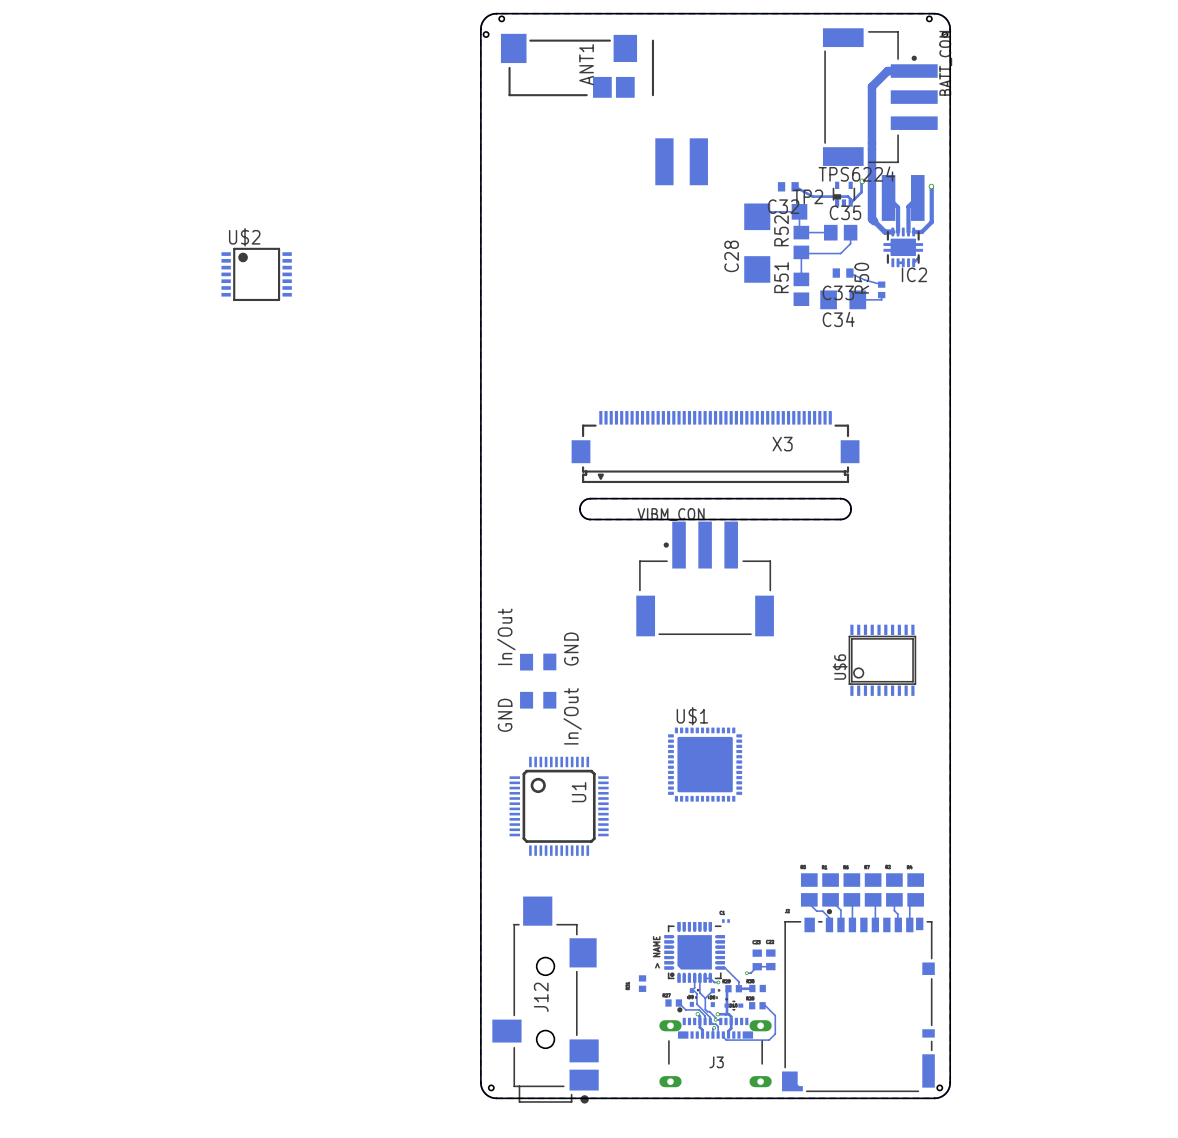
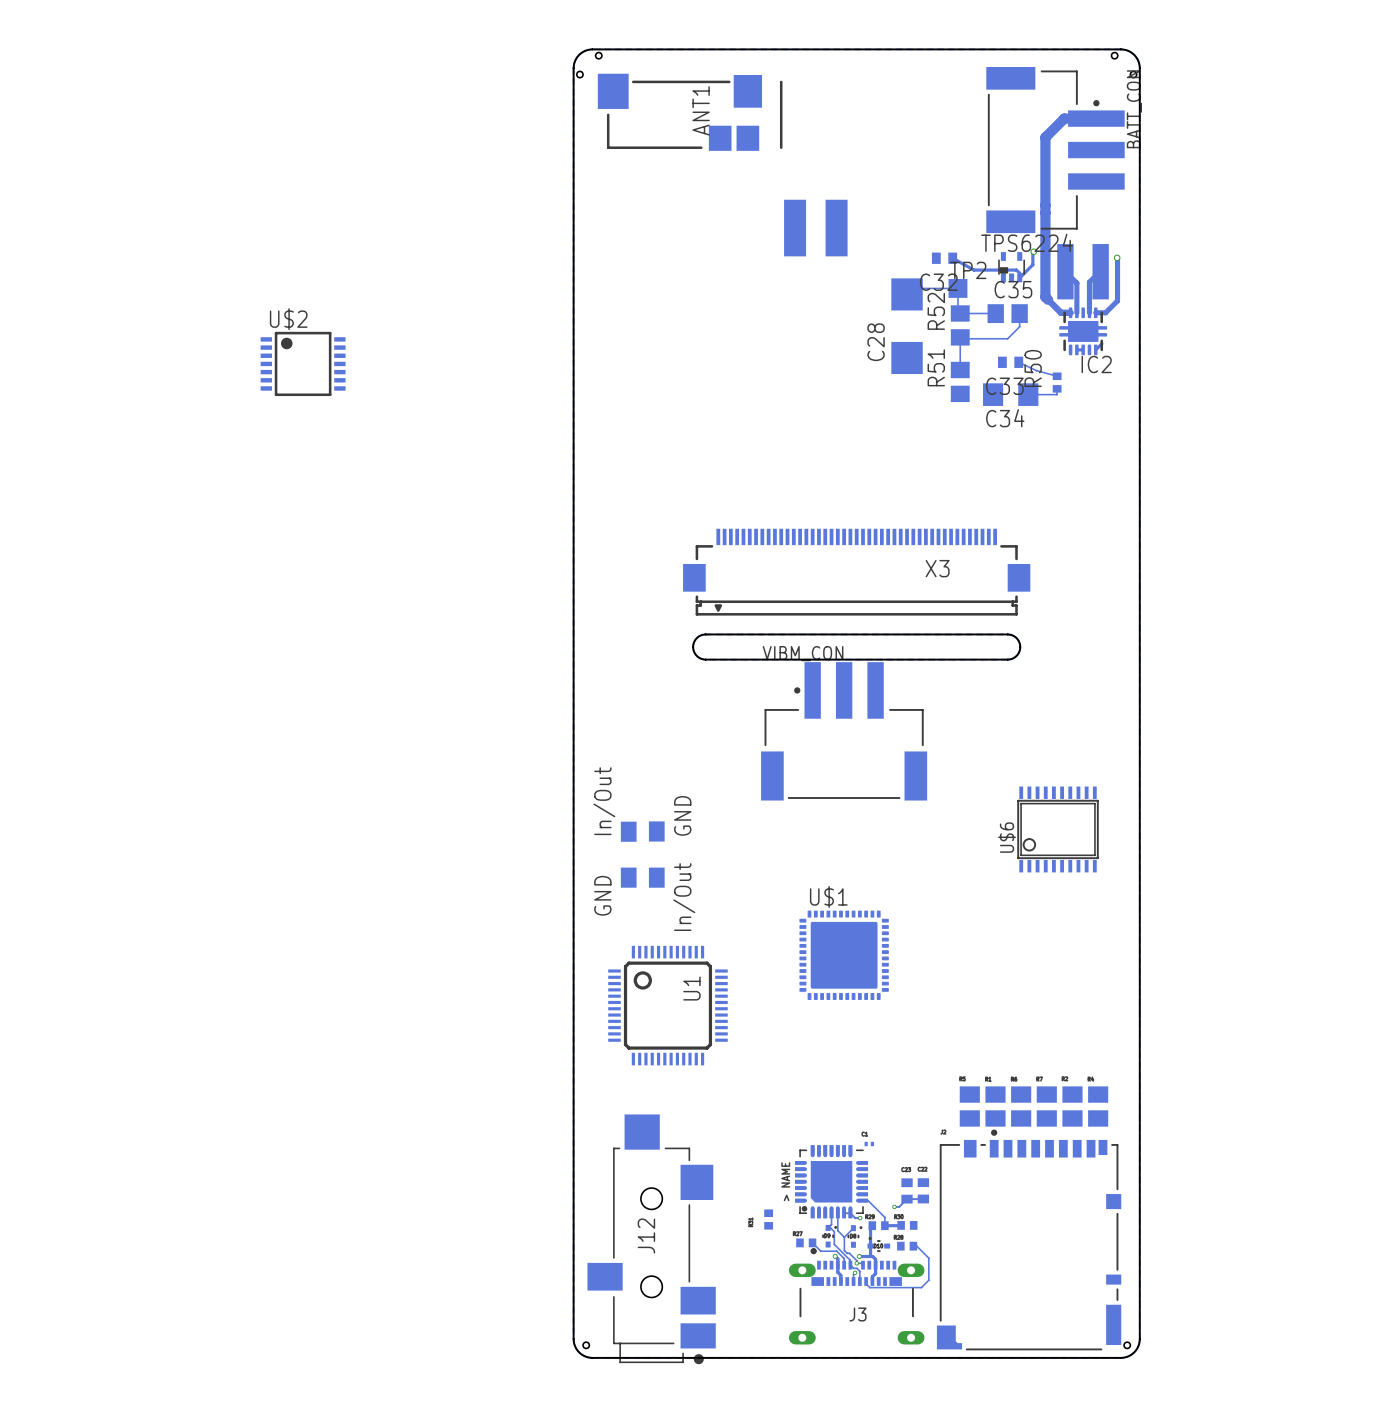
track: (809, 899) (809, 903) (816, 911) (822, 911) (829, 917) (829, 924) -> none
track: (830, 899) (840, 910) (840, 924) -> none
track: (851, 899) (852, 924) -> none
track: (873, 899) (875, 902) (875, 924) -> none
track: (894, 899) (894, 910) (897, 914) (898, 924) -> none
track: (915, 899) (909, 905) (909, 924) -> none

